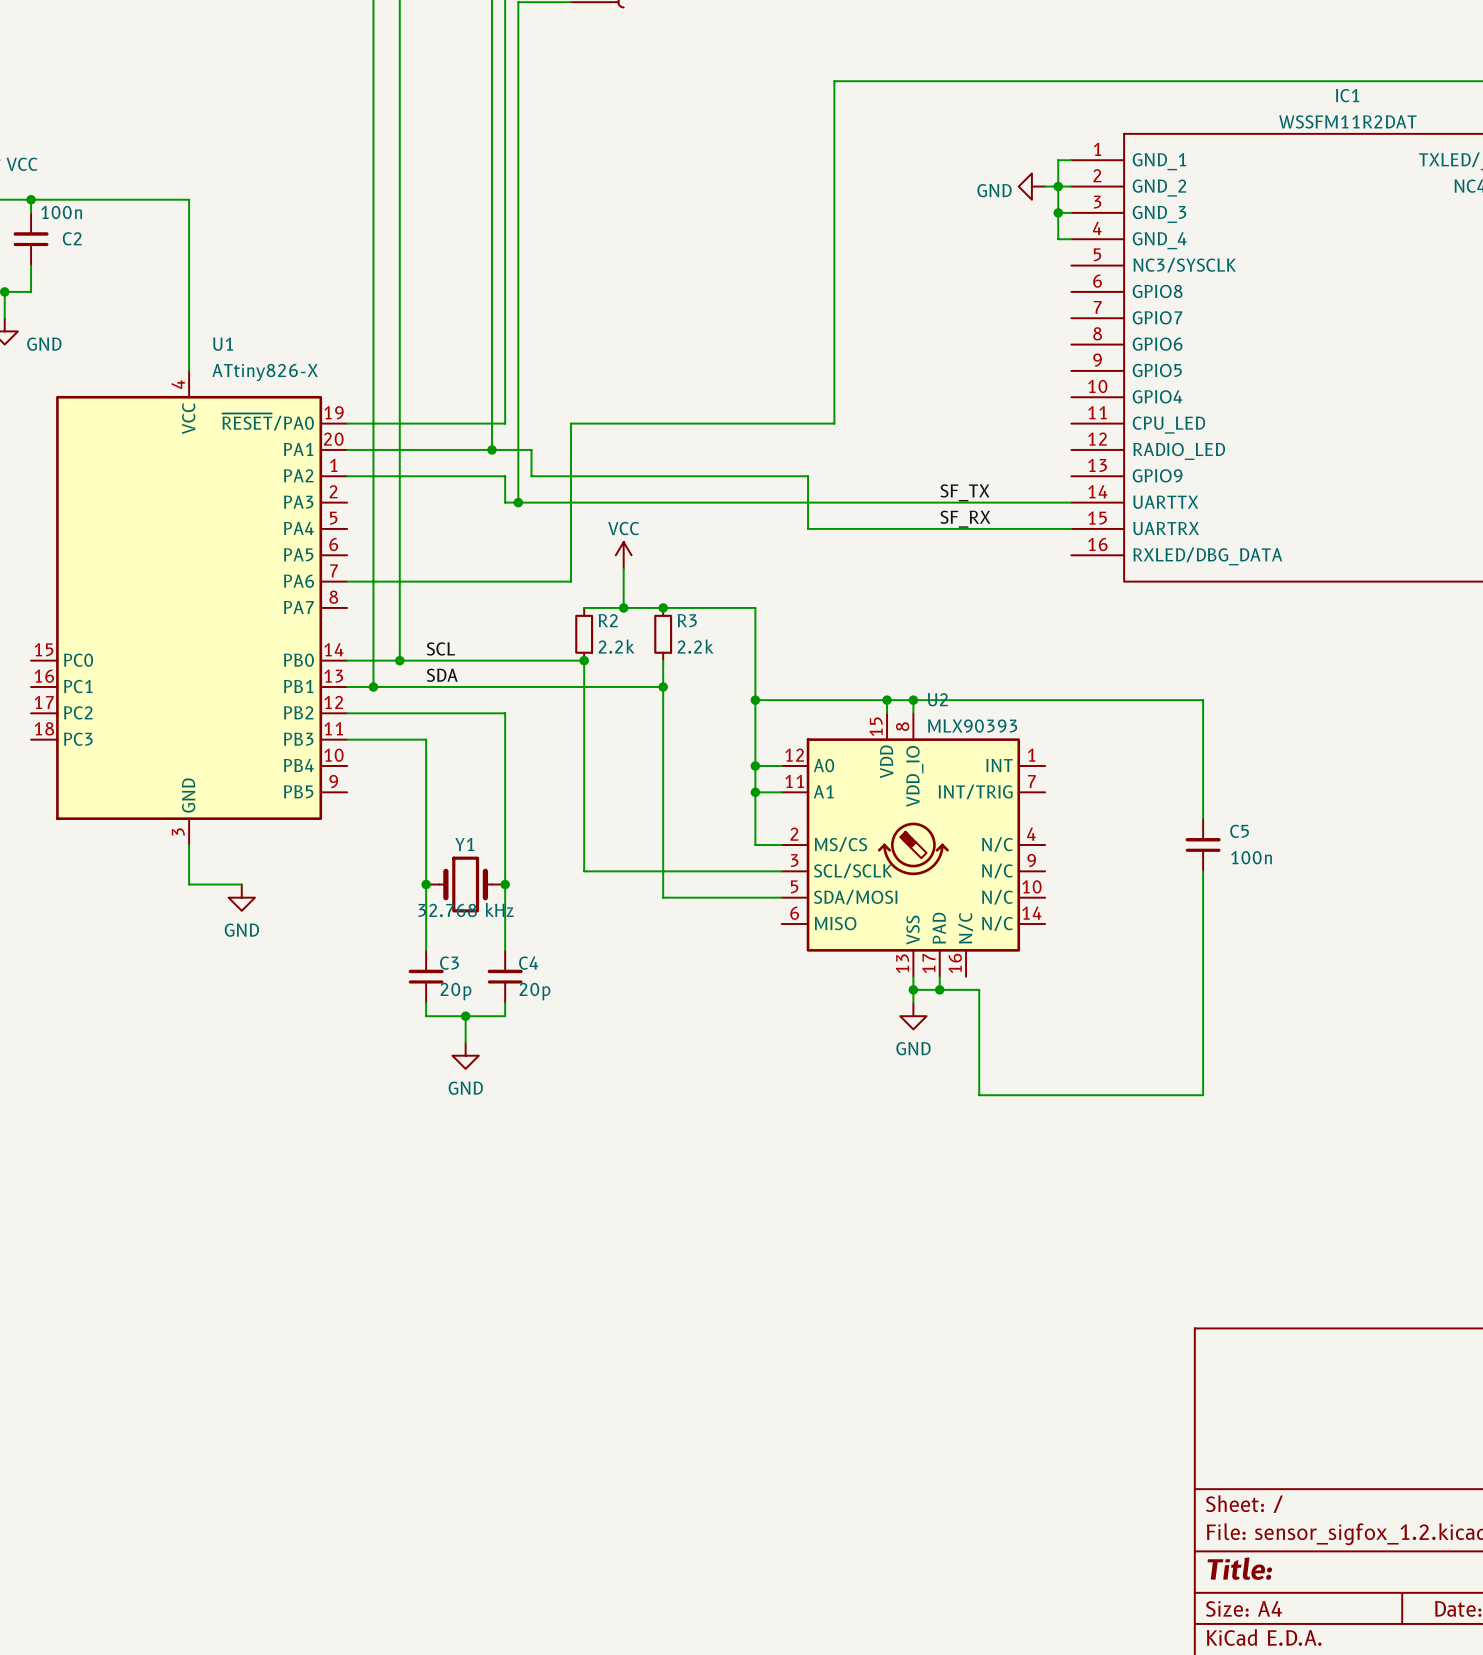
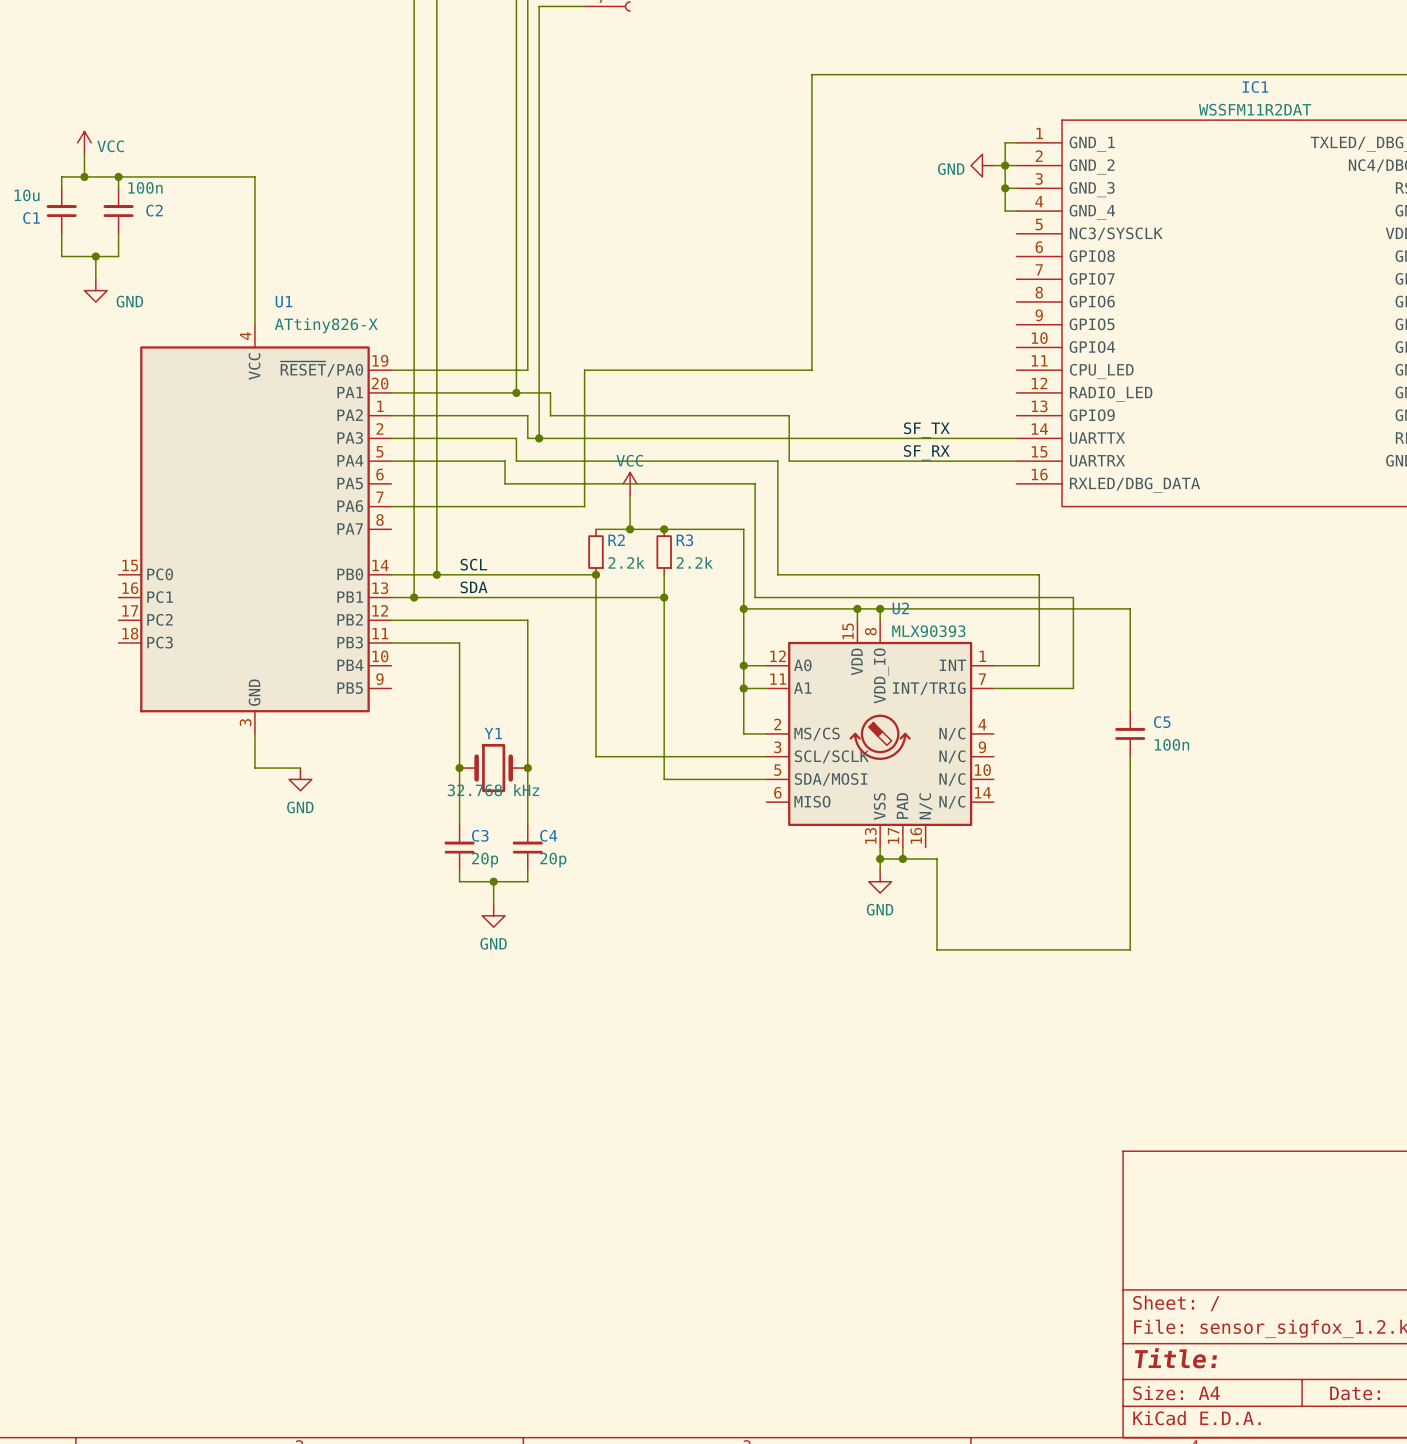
wire: none -> (391, 438) (516, 438) (516, 461) (777, 461) (777, 574) (1039, 574) (1039, 665) (993, 665)
wire: none -> (391, 461) (505, 461) (505, 483) (755, 483) (755, 597) (1073, 597) (1073, 688) (993, 688)

